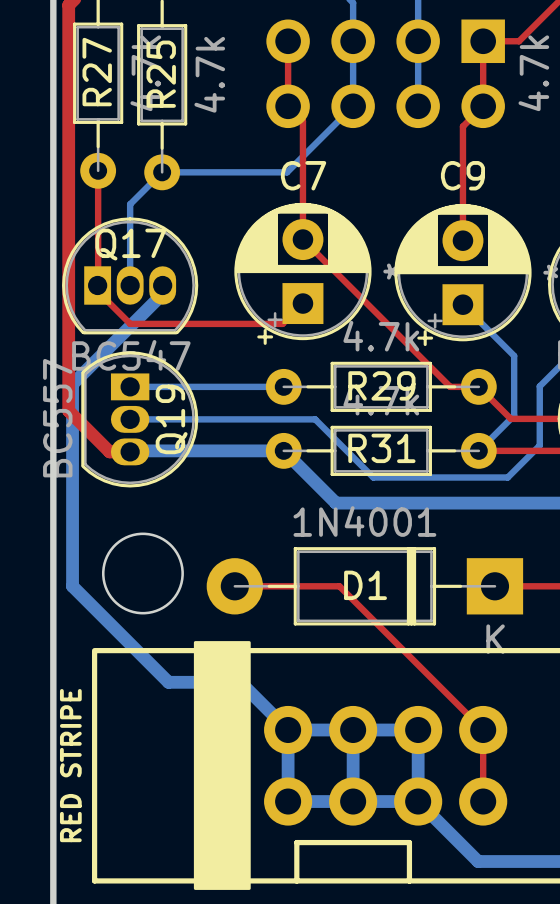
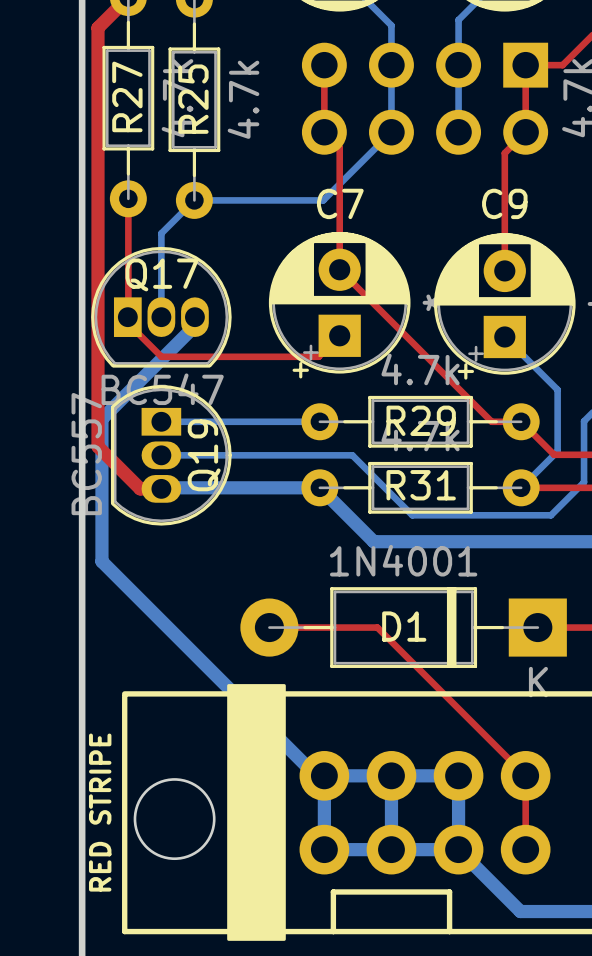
bottom track: (72, 522) (72, 586) (168, 682) (240, 682) (288, 730) -> (101, 561) (316, 775) (324, 775)
round board edge: [101, 532, 184, 615] -> none
round board edge: none -> [133, 778, 216, 861]

